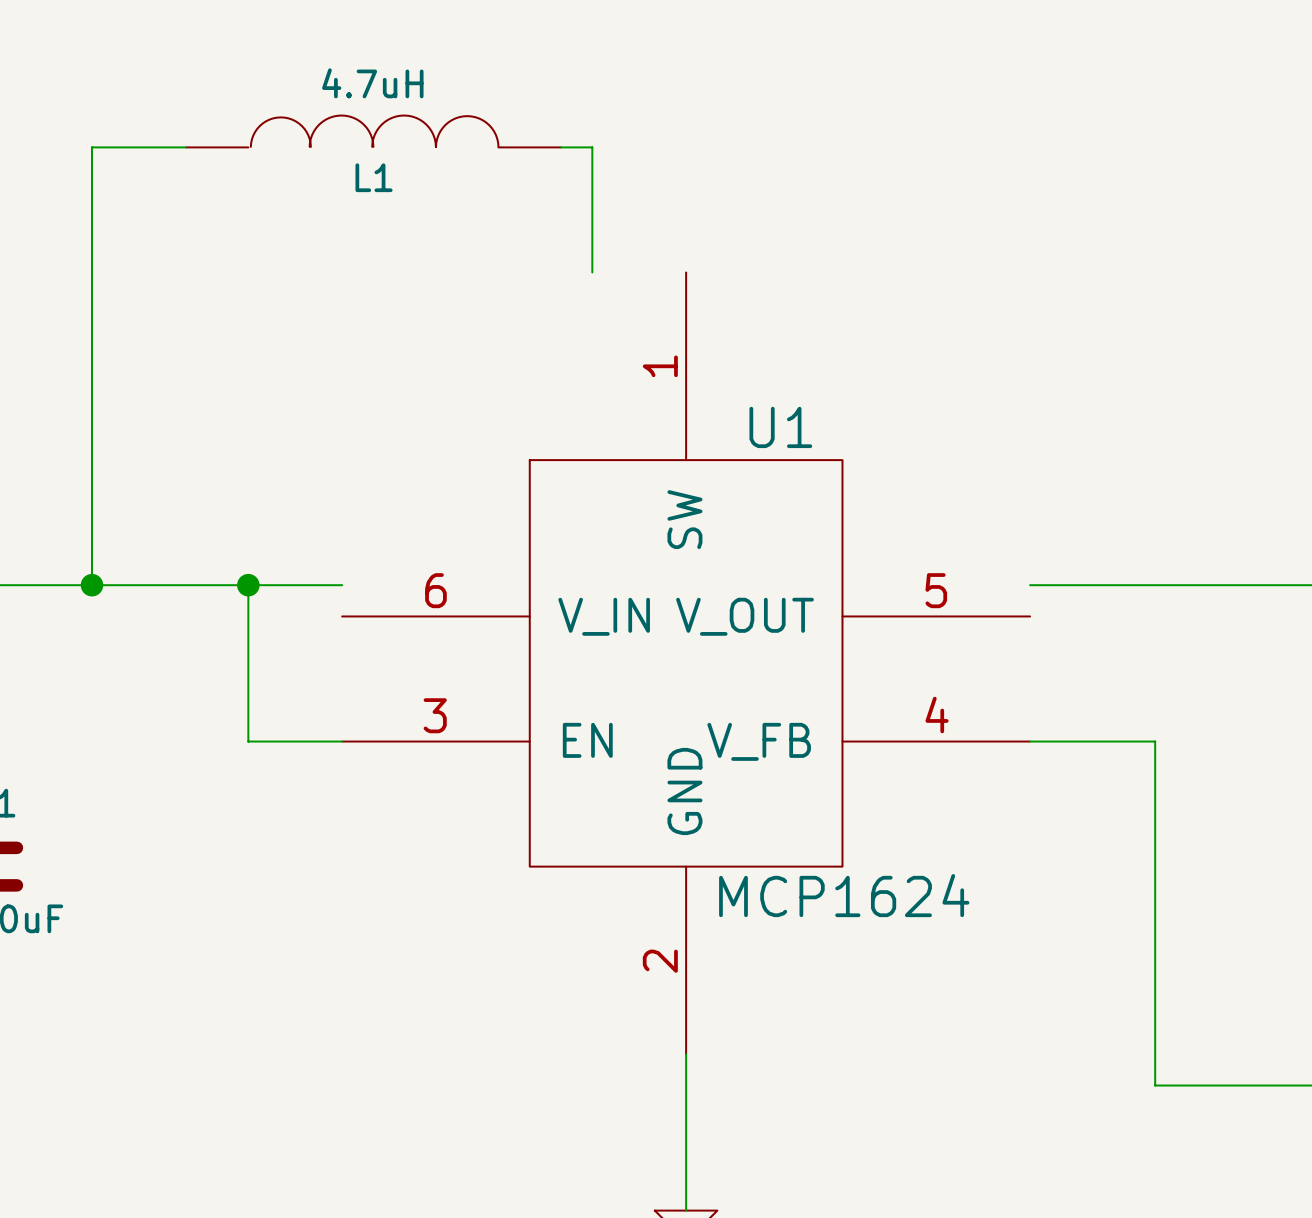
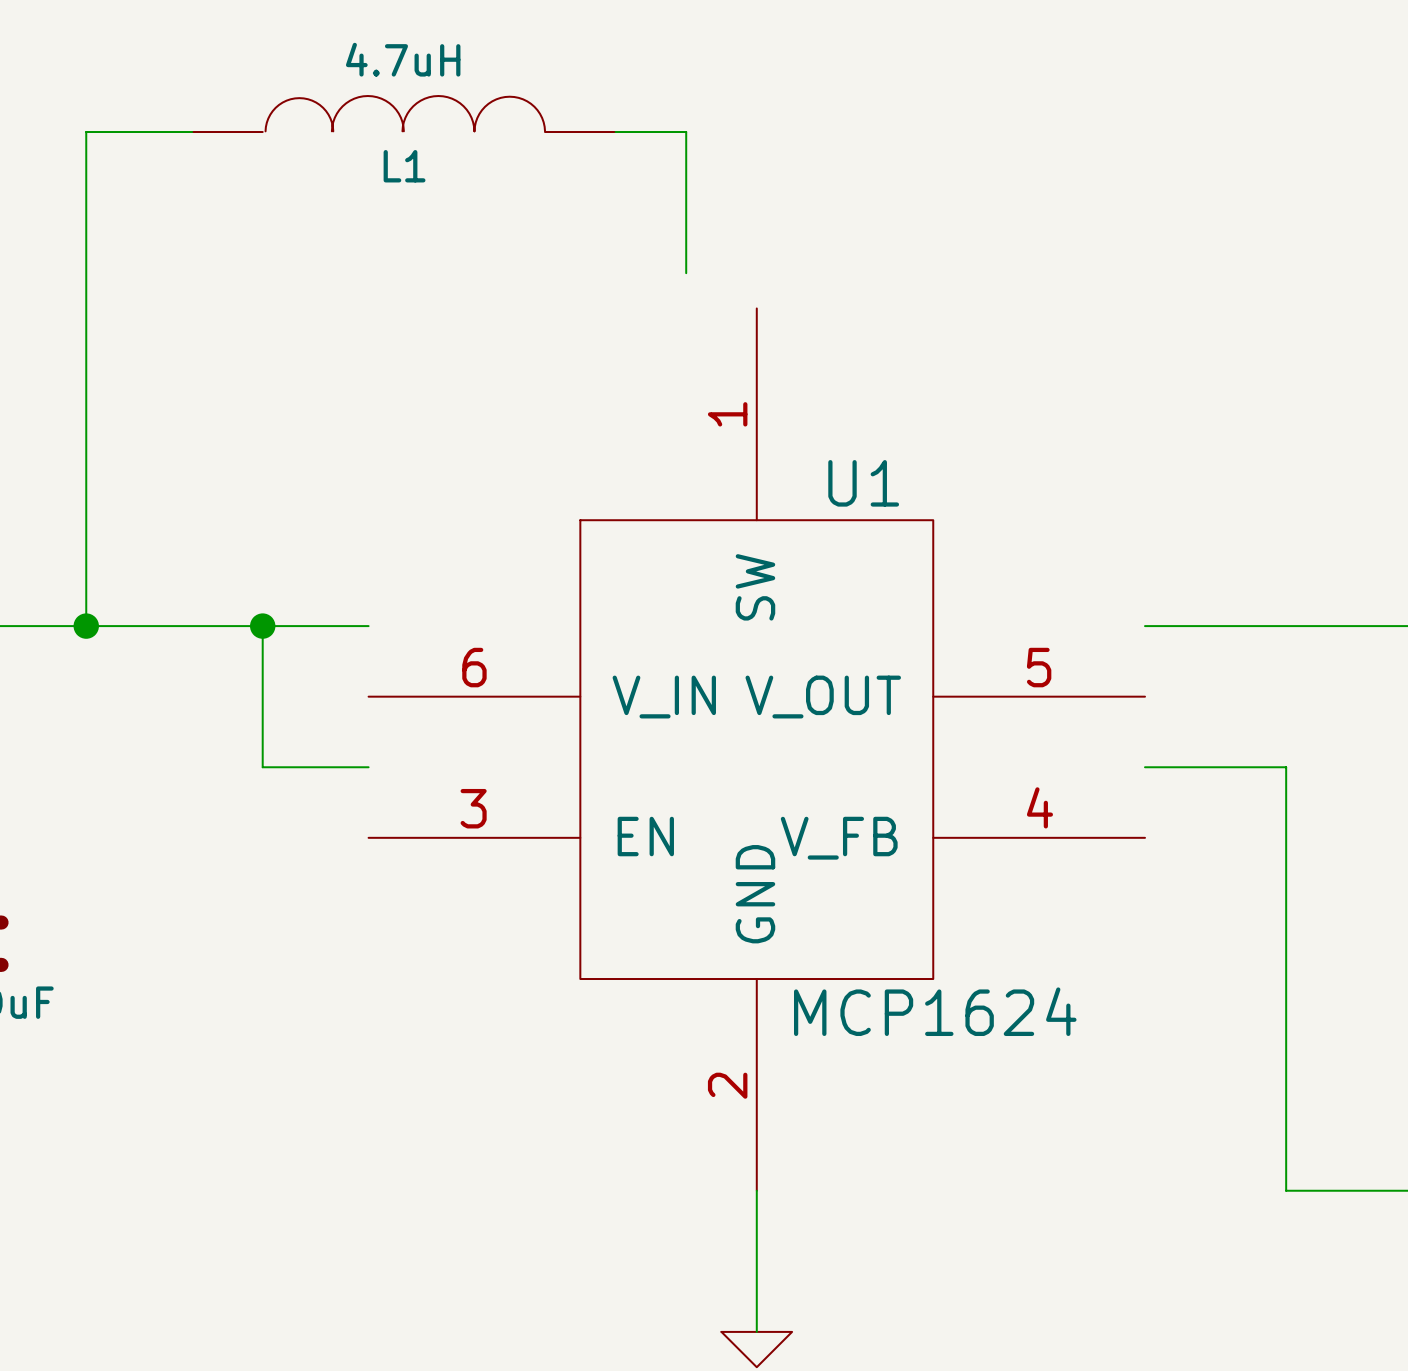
wire: (592, 147) (592, 272) -> (650, 132) (686, 132) (686, 273)
U1 position: (686, 663) -> (756, 749)
wire: (248, 710) (248, 741) (342, 741) -> (262, 767) (368, 767)
wire: (1030, 741) (1155, 741) -> (1145, 767) (1286, 767) (1286, 802)

